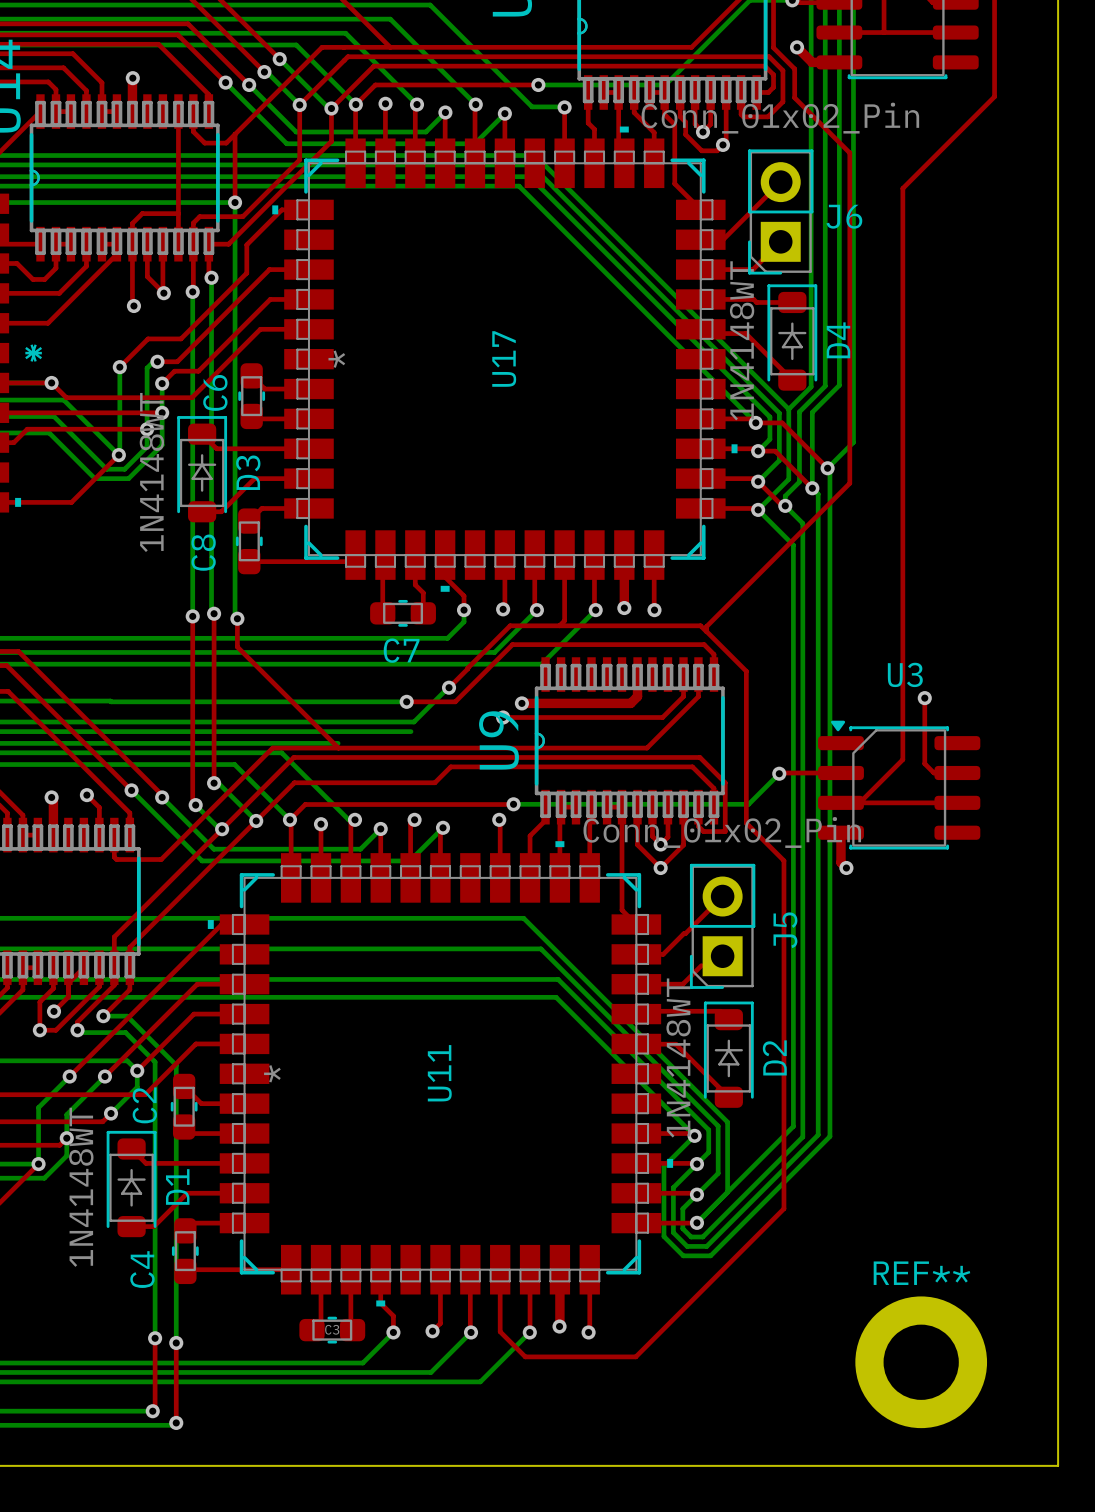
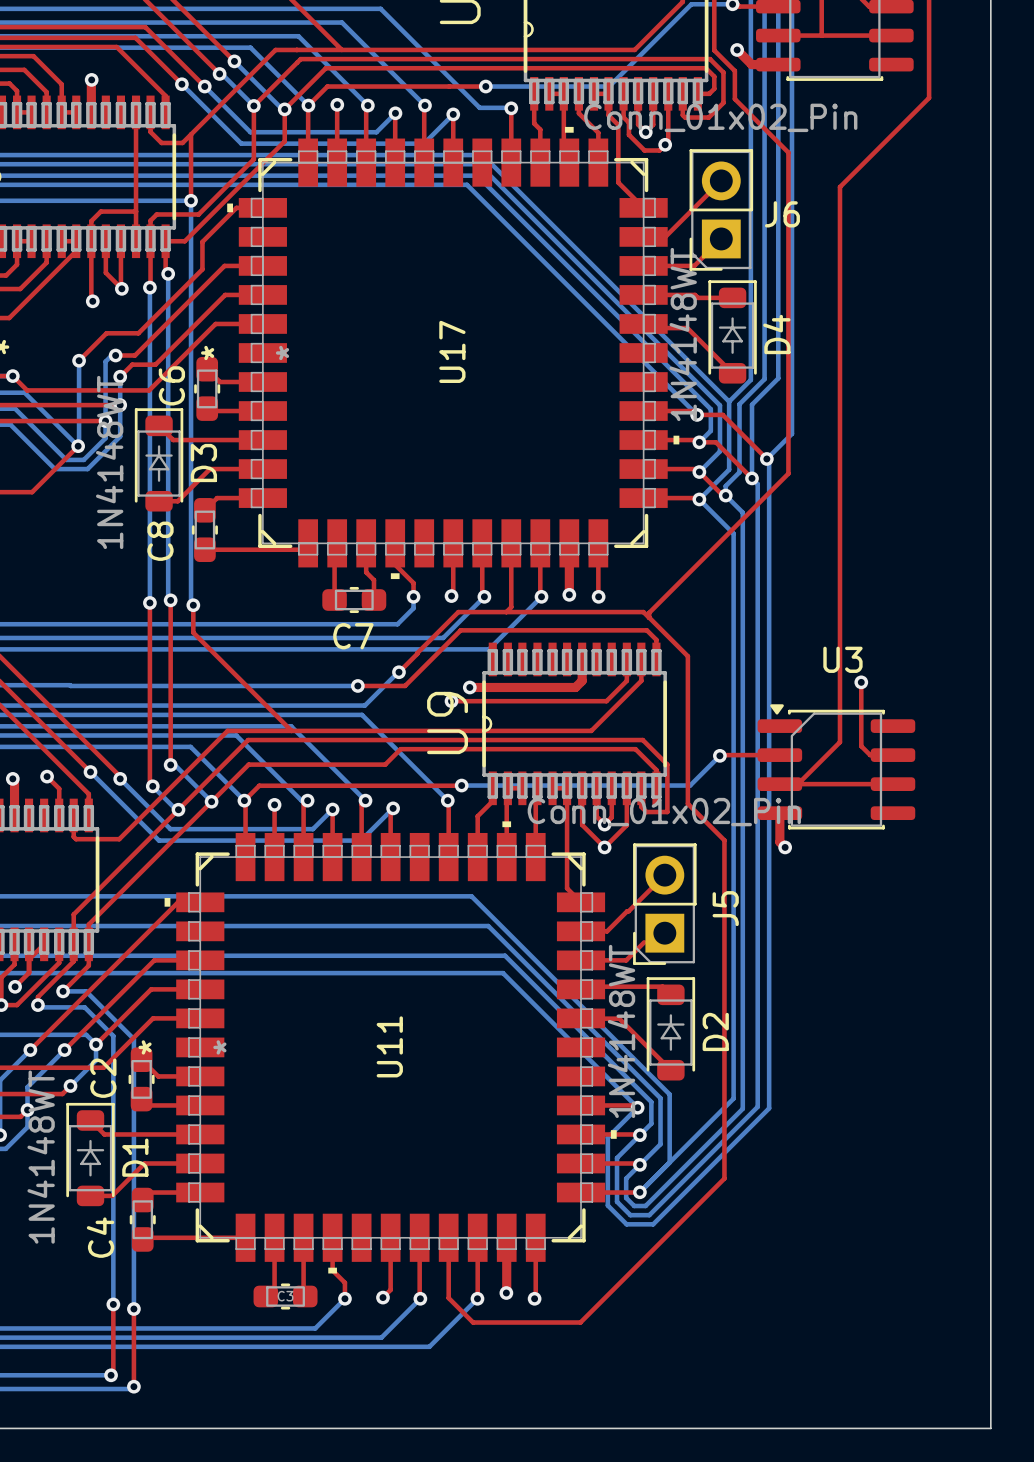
U17 text: none -> * (207, 352)
bottom track: none -> (362, 714) (447, 800)
bottom track: none -> (291, 726) (365, 800)
U11 text: none -> * (145, 1047)
REF**: (921, 1362) -> none

